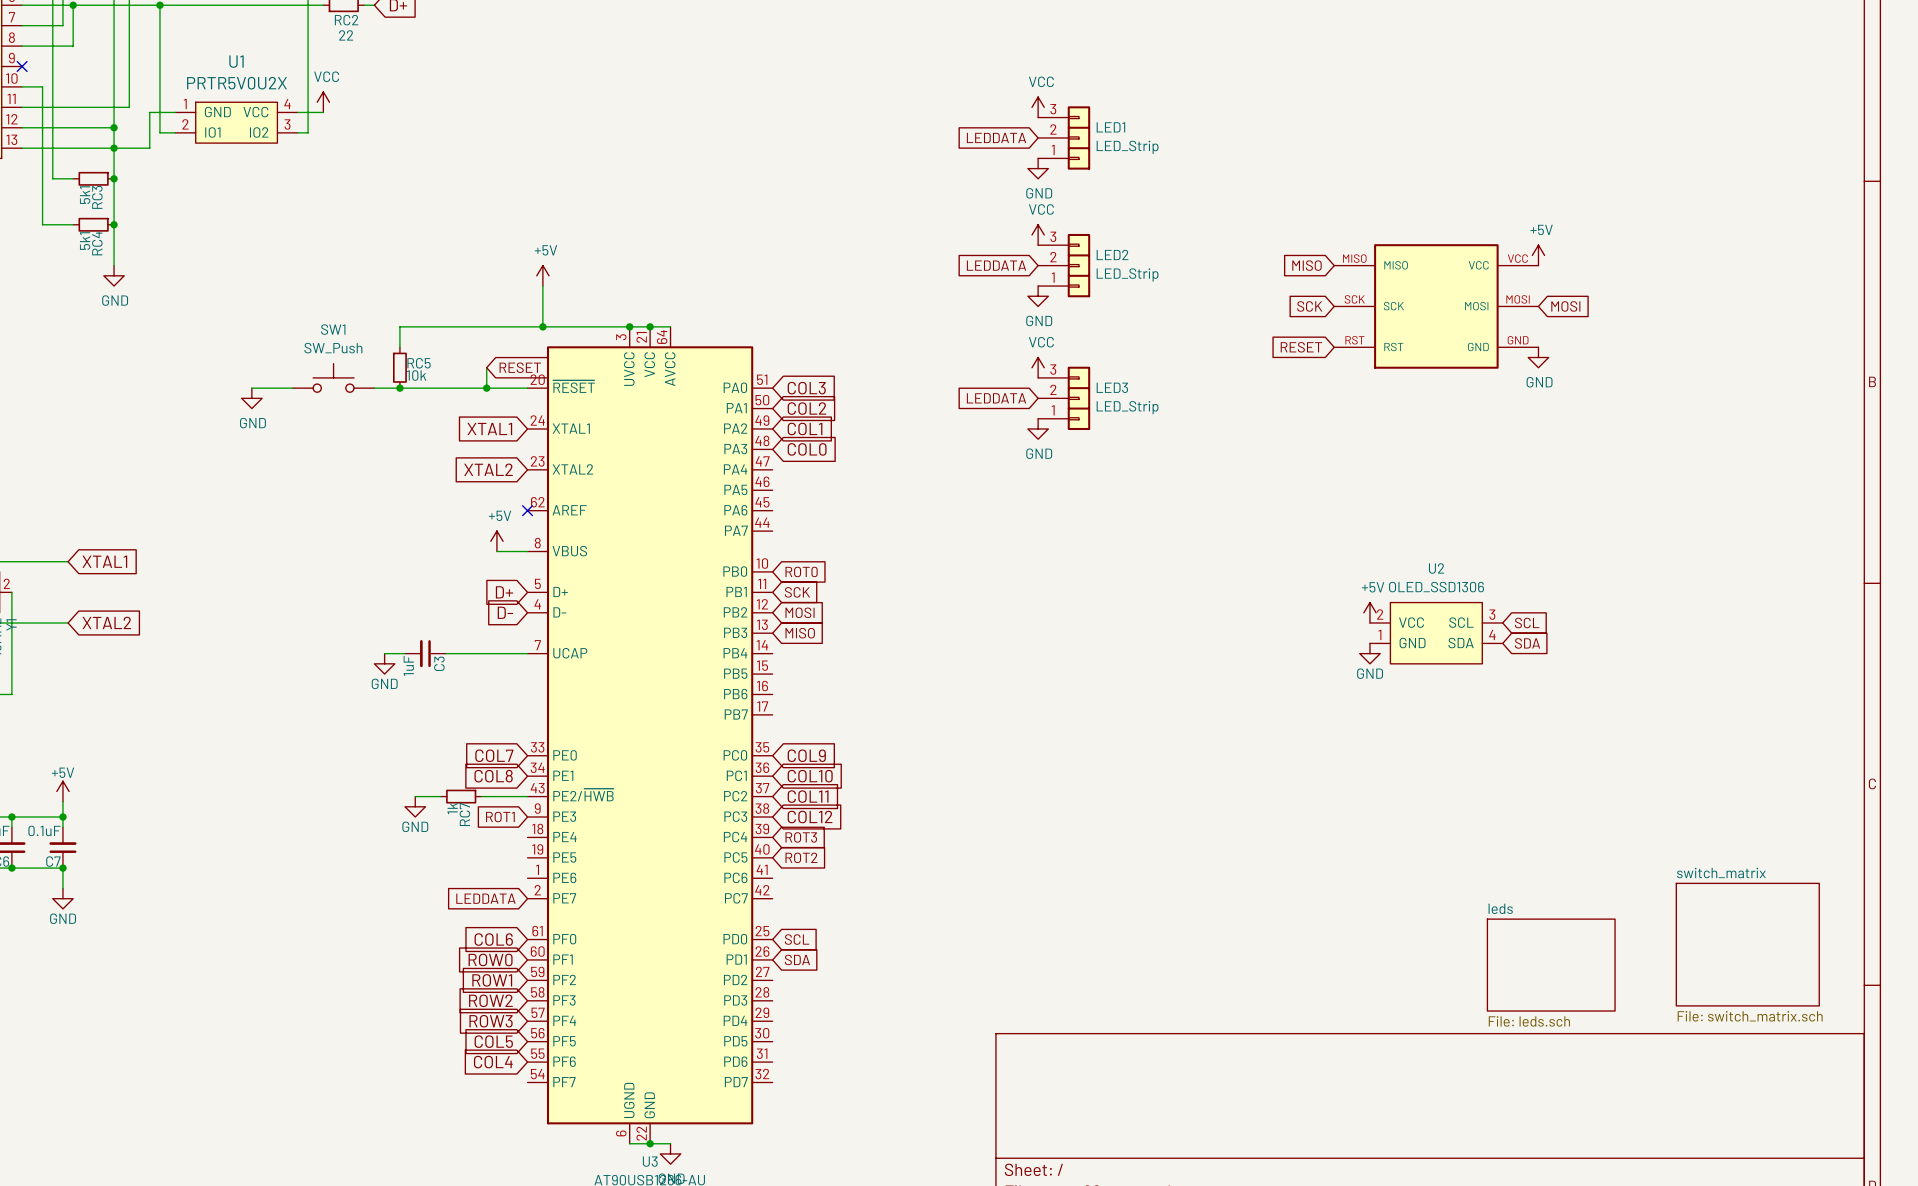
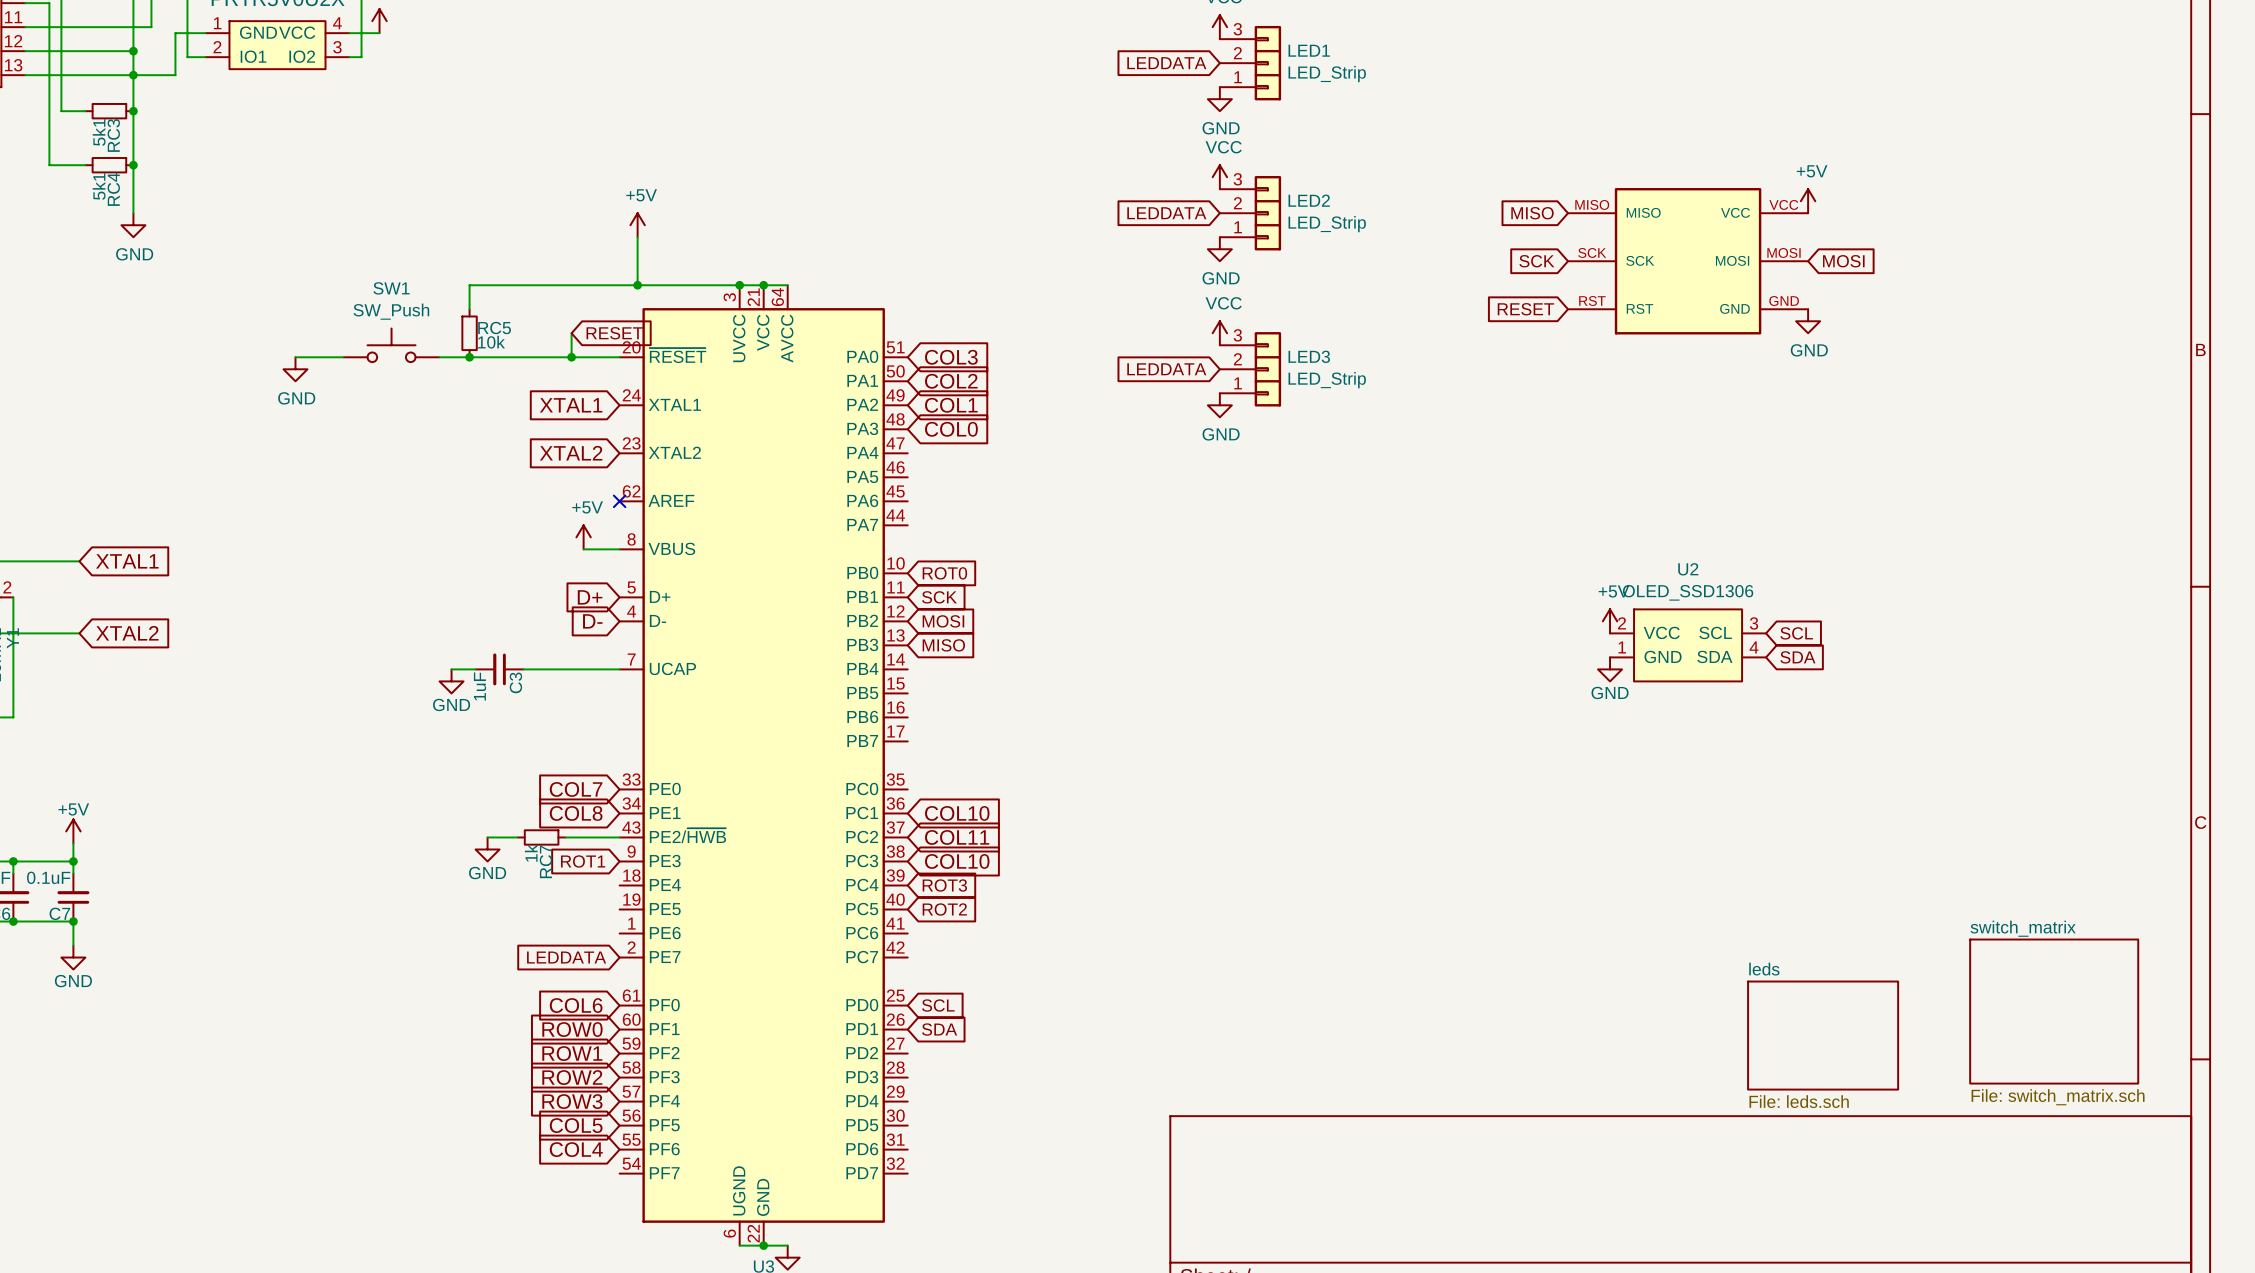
global label: COL9 (806, 755) -> none
global label: COL12 (810, 817) -> COL10 (957, 861)

